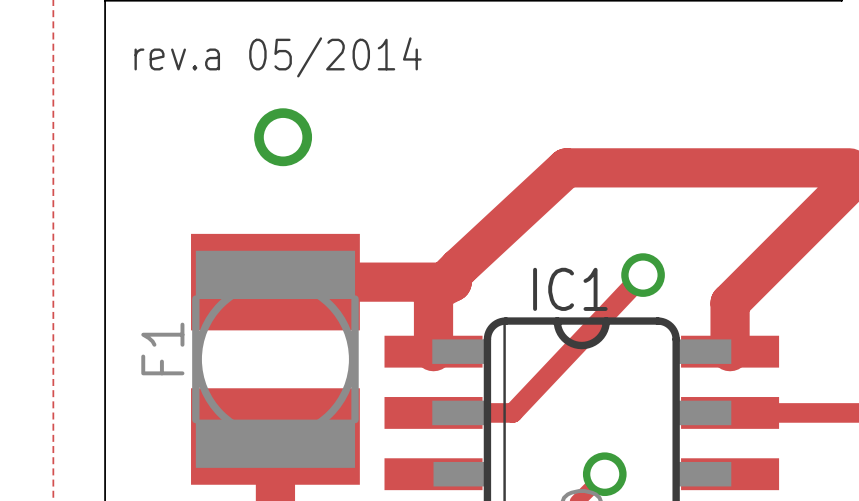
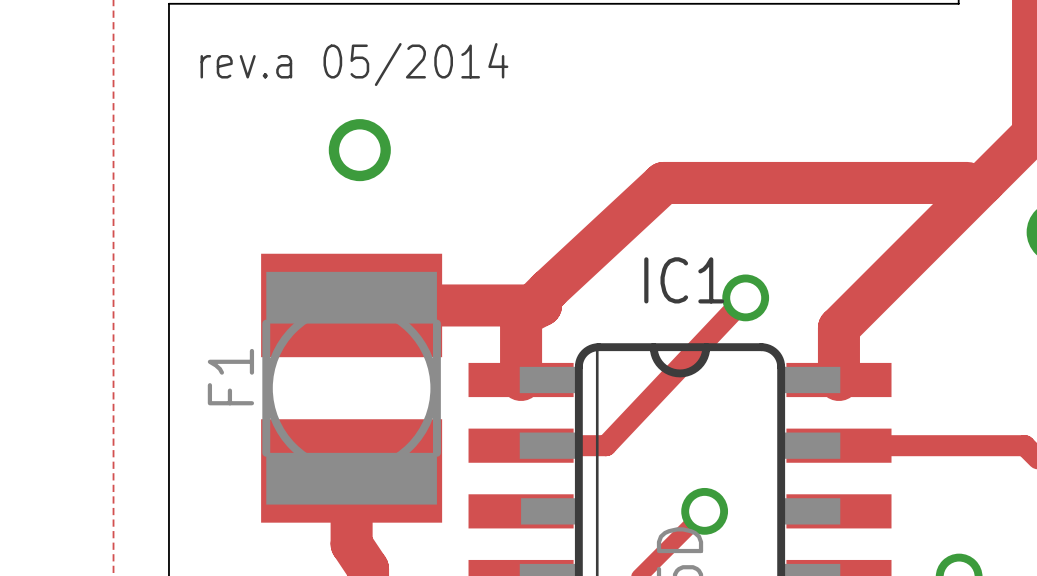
IC1 name position: IC1 (570, 289) -> IC1 (684, 280)

